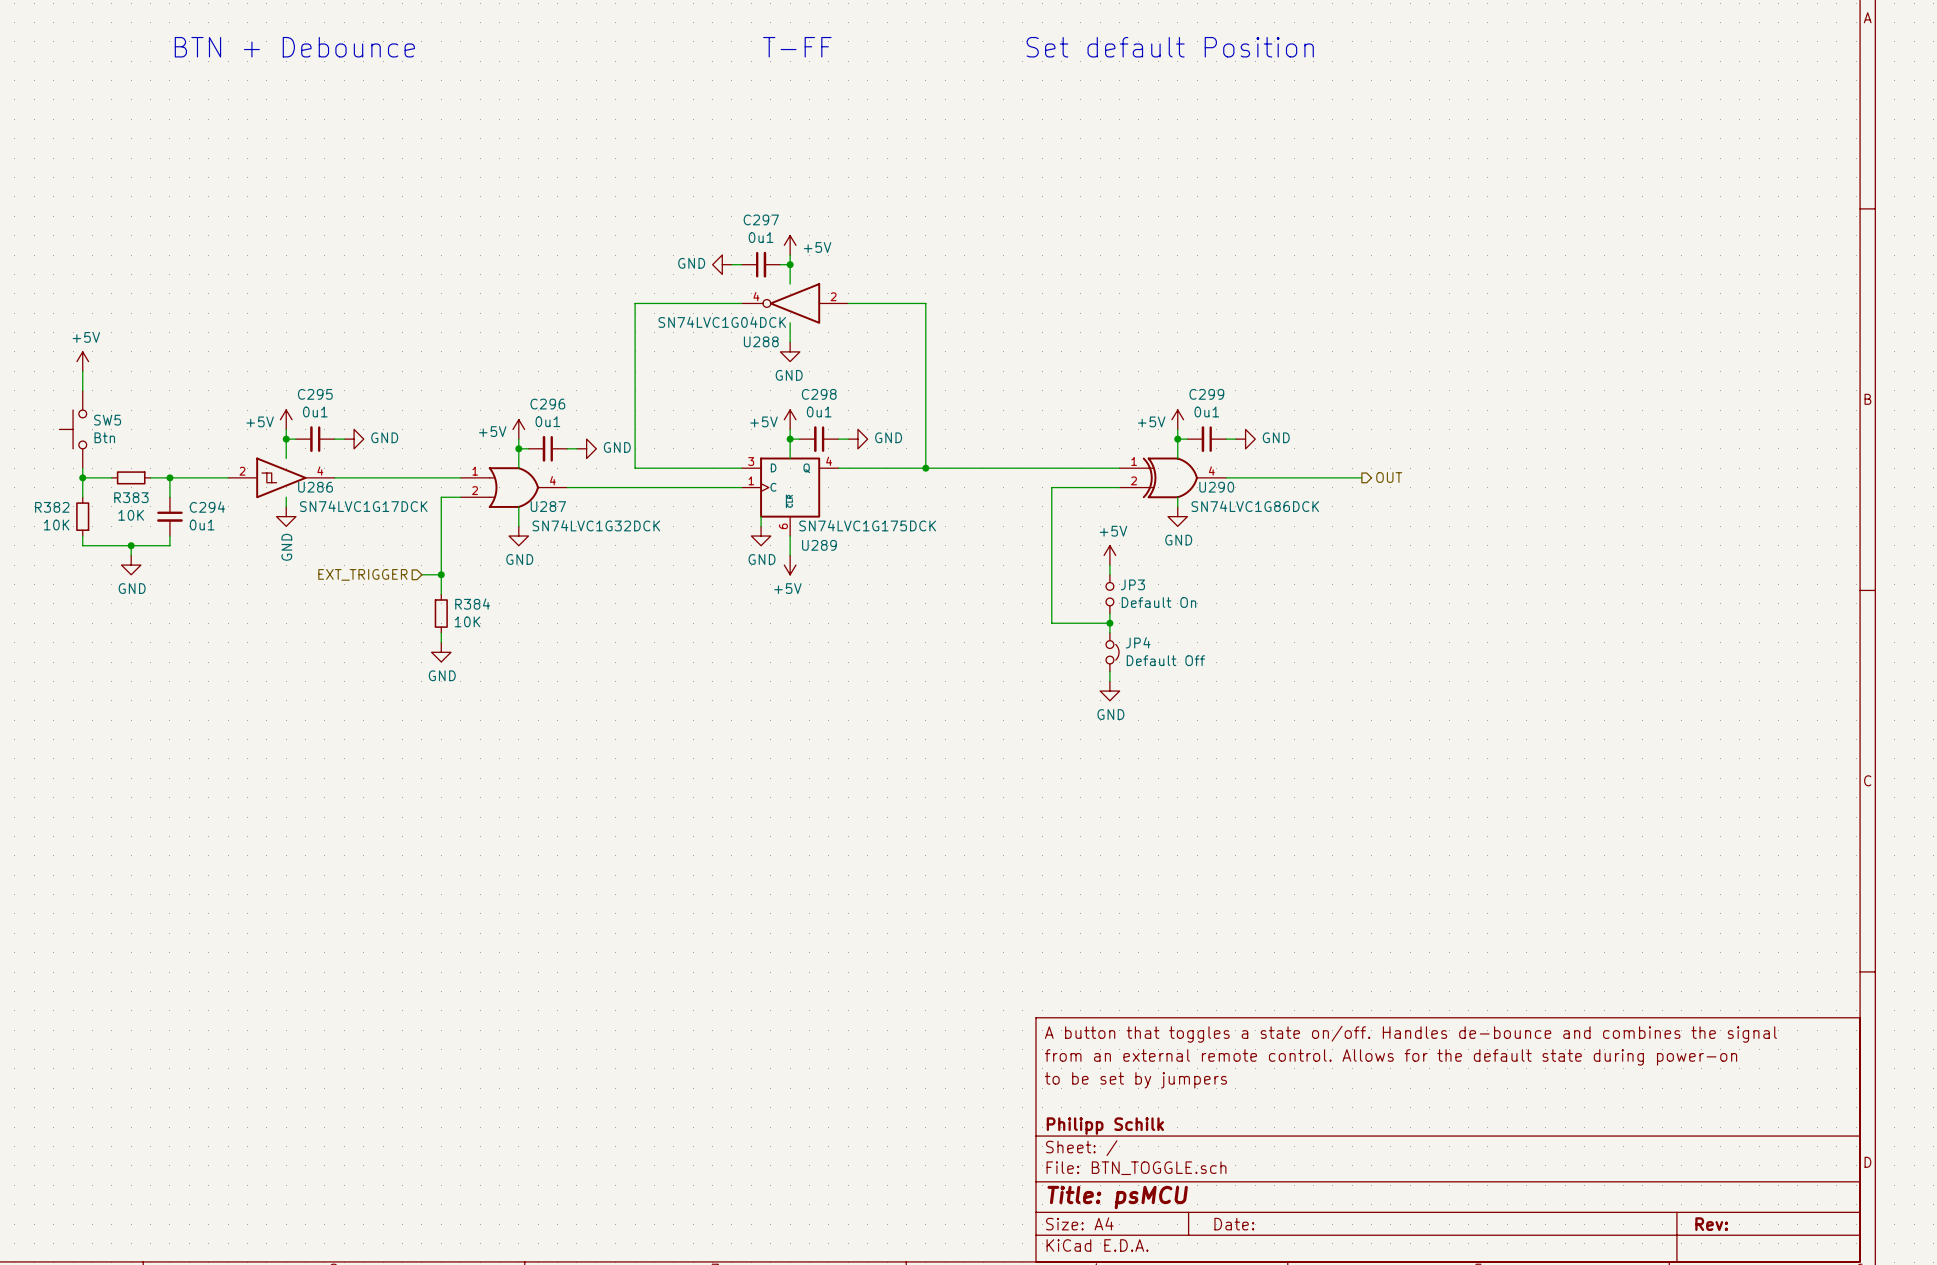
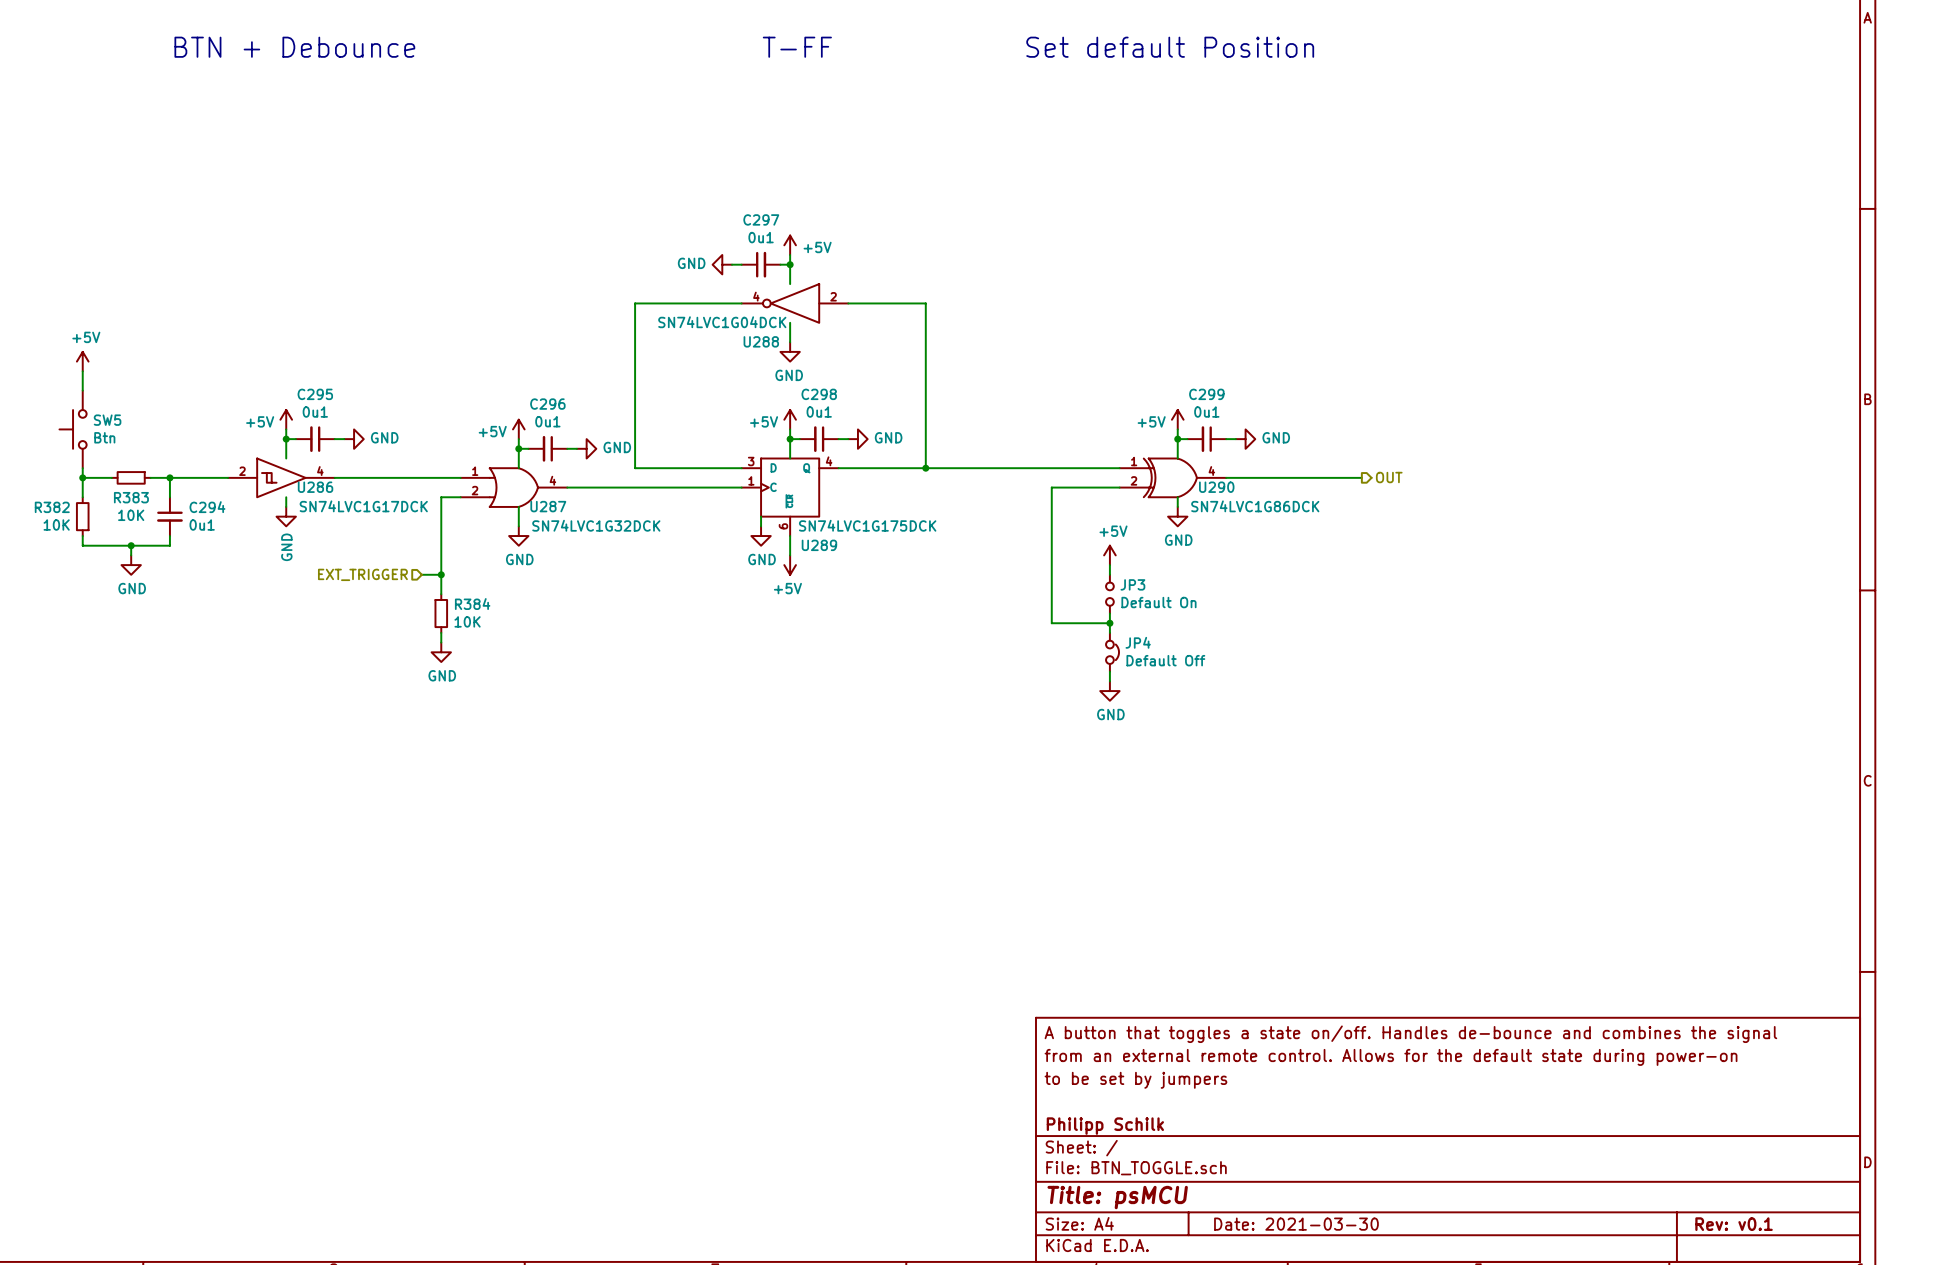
title block: Date: (1234, 1224) -> Date: 2021-03-30 (1296, 1224)
title block: Rev: (1711, 1224) -> Rev: v0.1 (1734, 1224)

